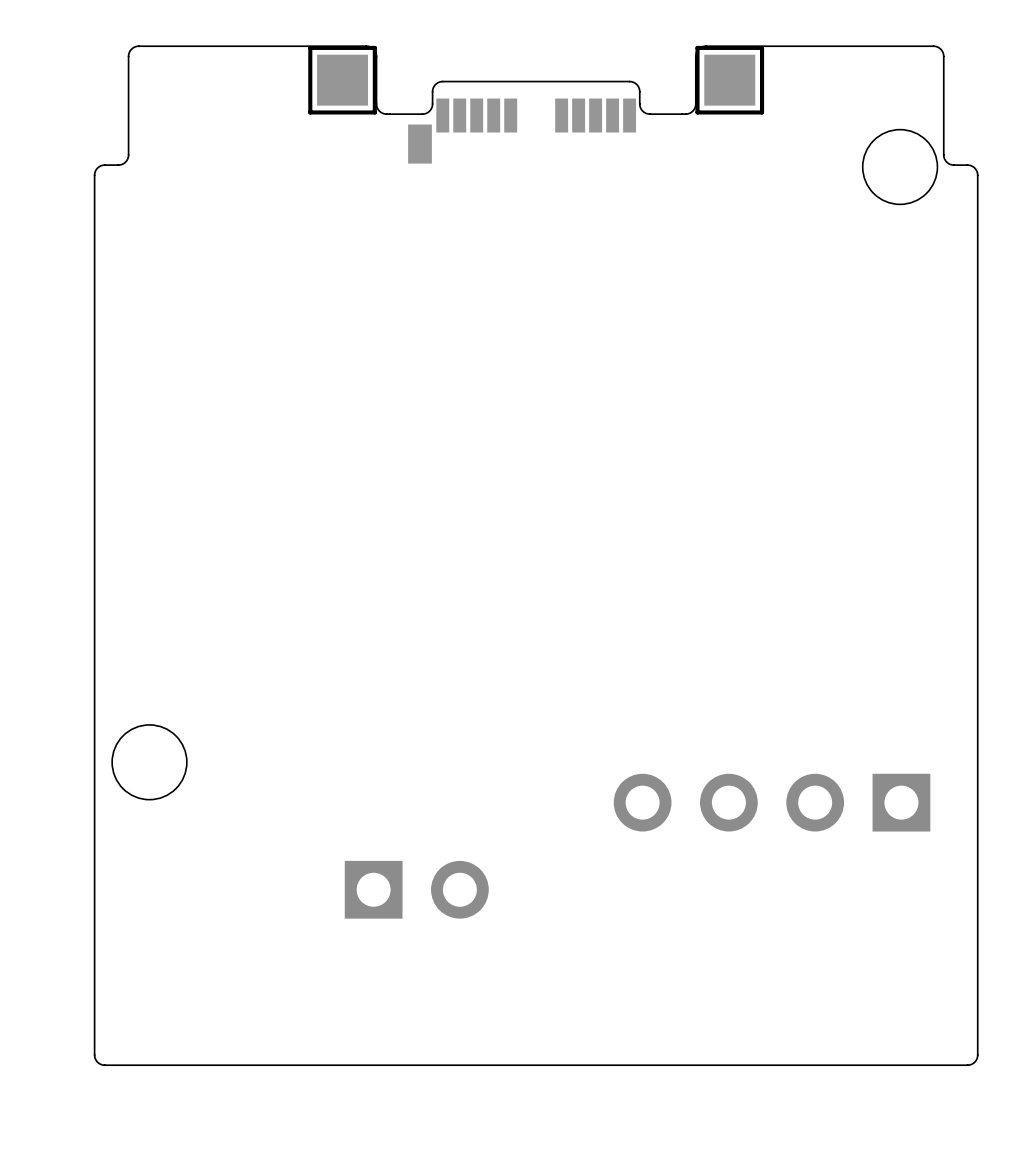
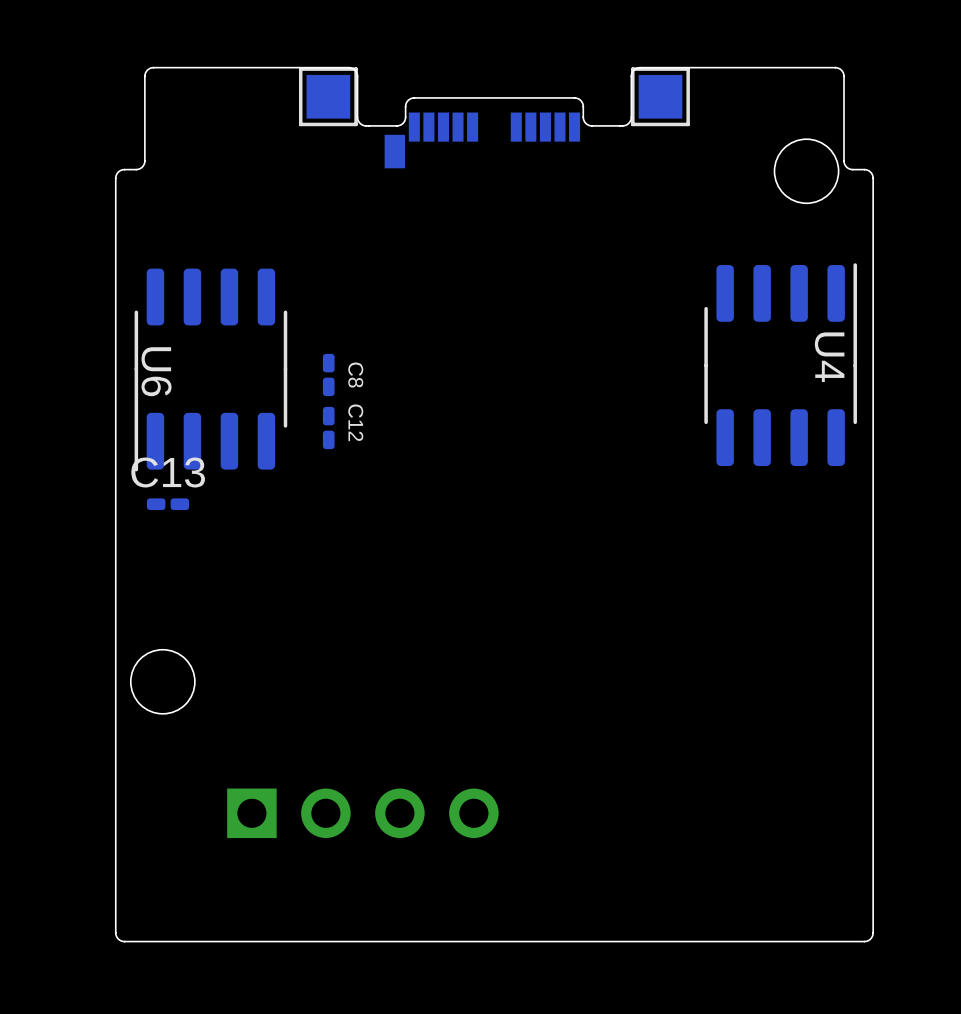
U4: none -> (780, 364)
U6: none -> (210, 369)
C8: none -> (328, 374)
C12: none -> (328, 428)
C13: none -> (168, 504)
part rotation: 0° (772, 802) -> 180° (362, 813)
part position: (772, 802) -> (362, 813)
part: (416, 889) -> none

